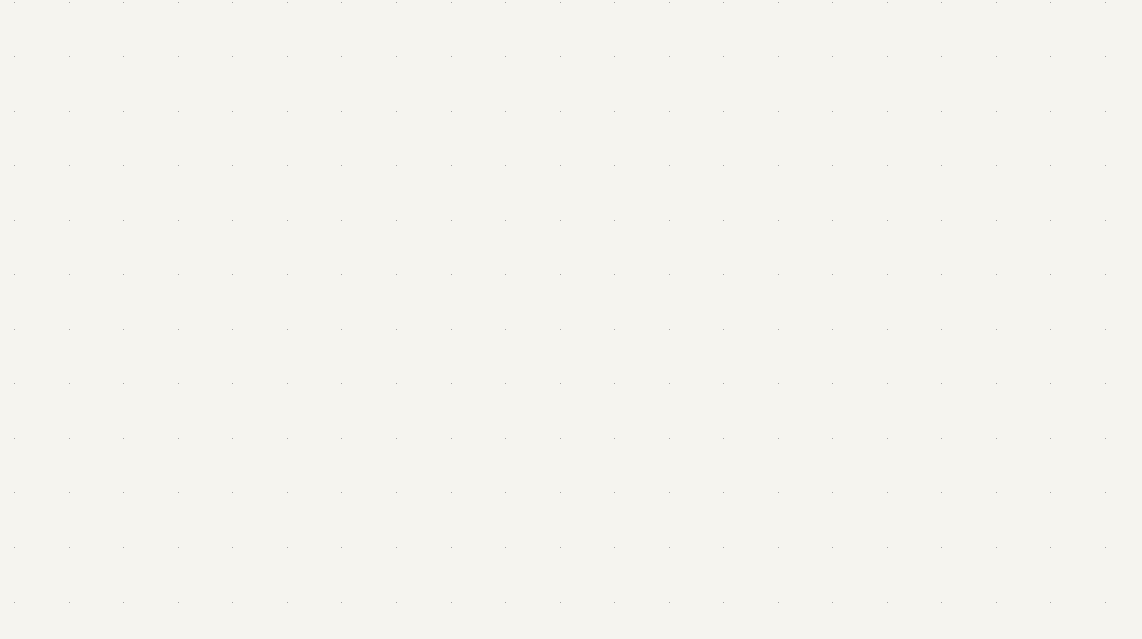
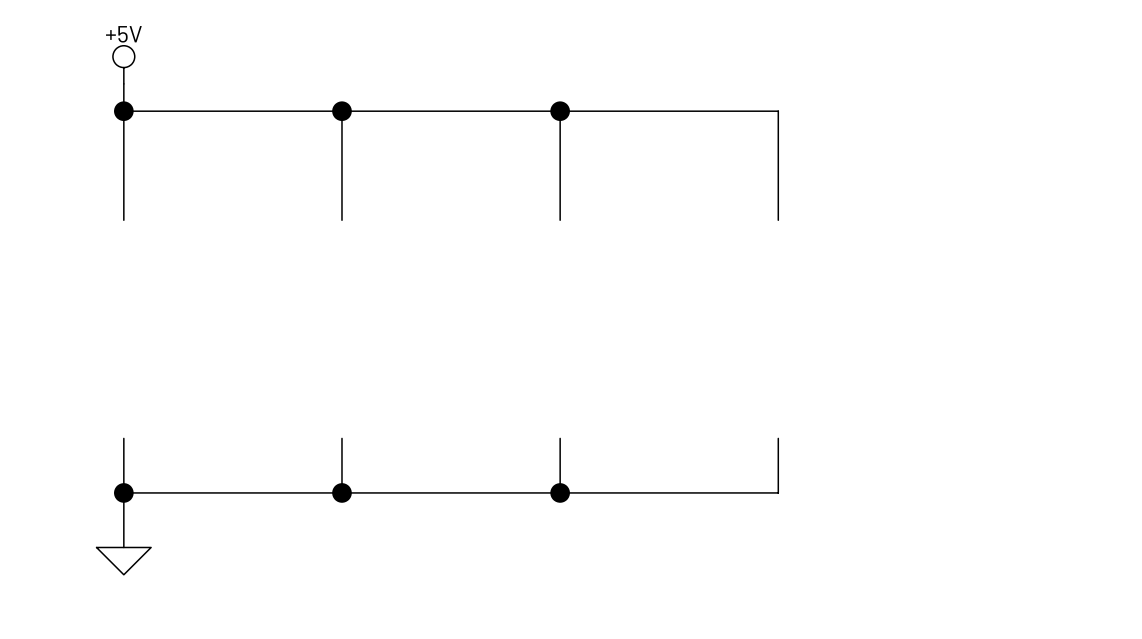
power symbol: none -> +5V (123, 64)
wire: none -> (123, 83) (123, 220)
wire: none -> (123, 111) (778, 111) (778, 220)
junction: none -> (123, 111)
wire: none -> (341, 111) (341, 220)
junction: none -> (341, 111)
wire: none -> (560, 111) (560, 220)
junction: none -> (560, 111)
wire: none -> (123, 438) (123, 547)
wire: none -> (341, 438) (341, 492)
wire: none -> (560, 438) (560, 492)
wire: none -> (778, 438) (778, 492) (123, 492)
junction: none -> (123, 492)
junction: none -> (341, 492)
junction: none -> (560, 492)
power symbol: none -> (123, 561)

